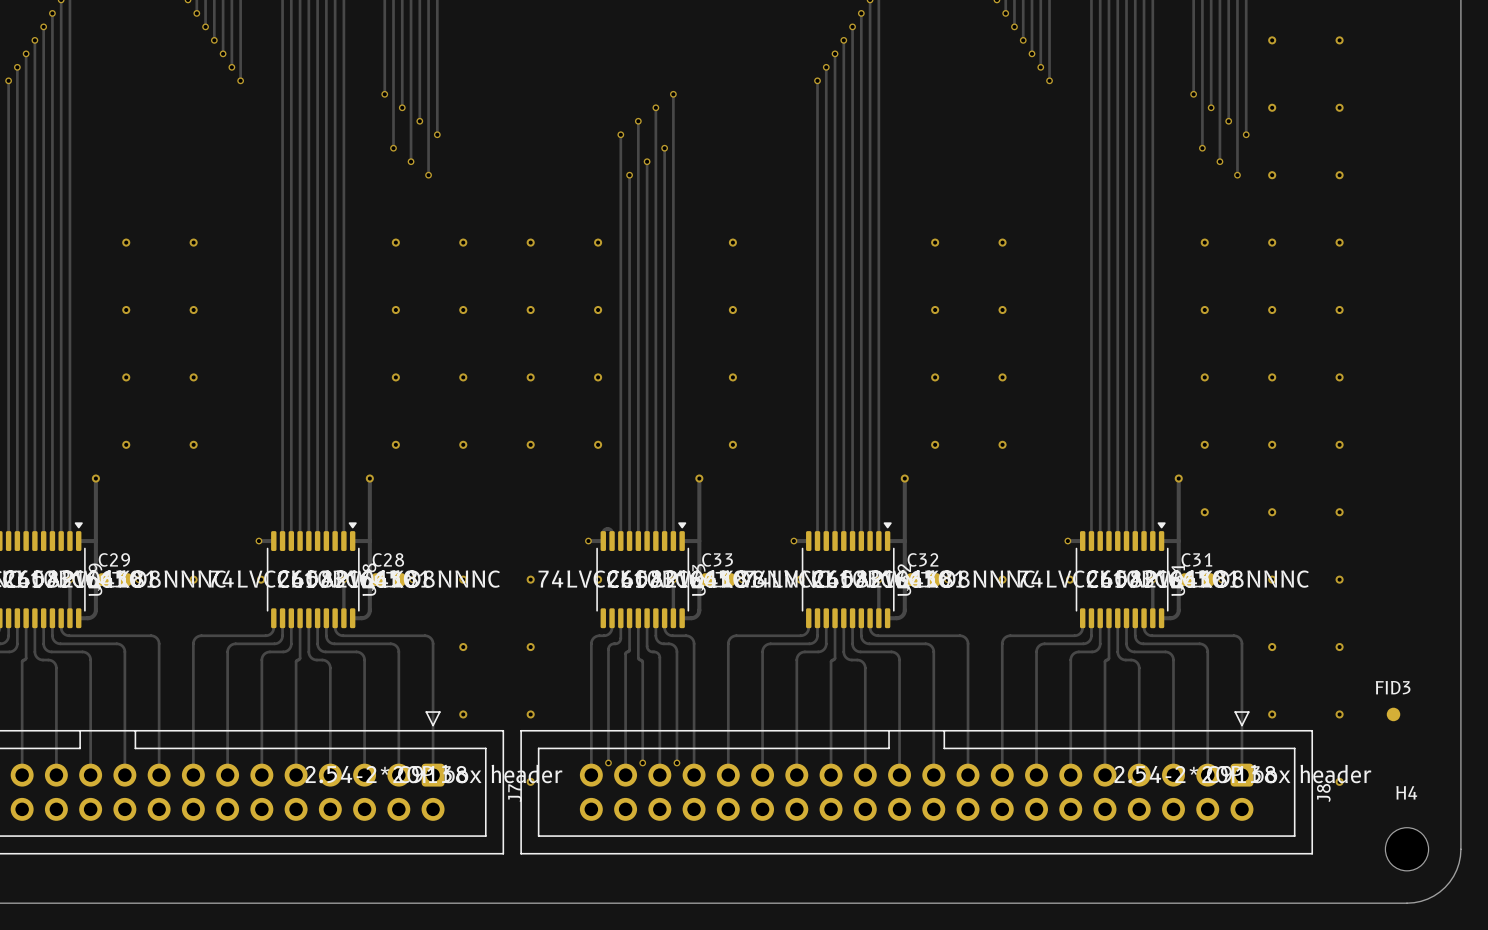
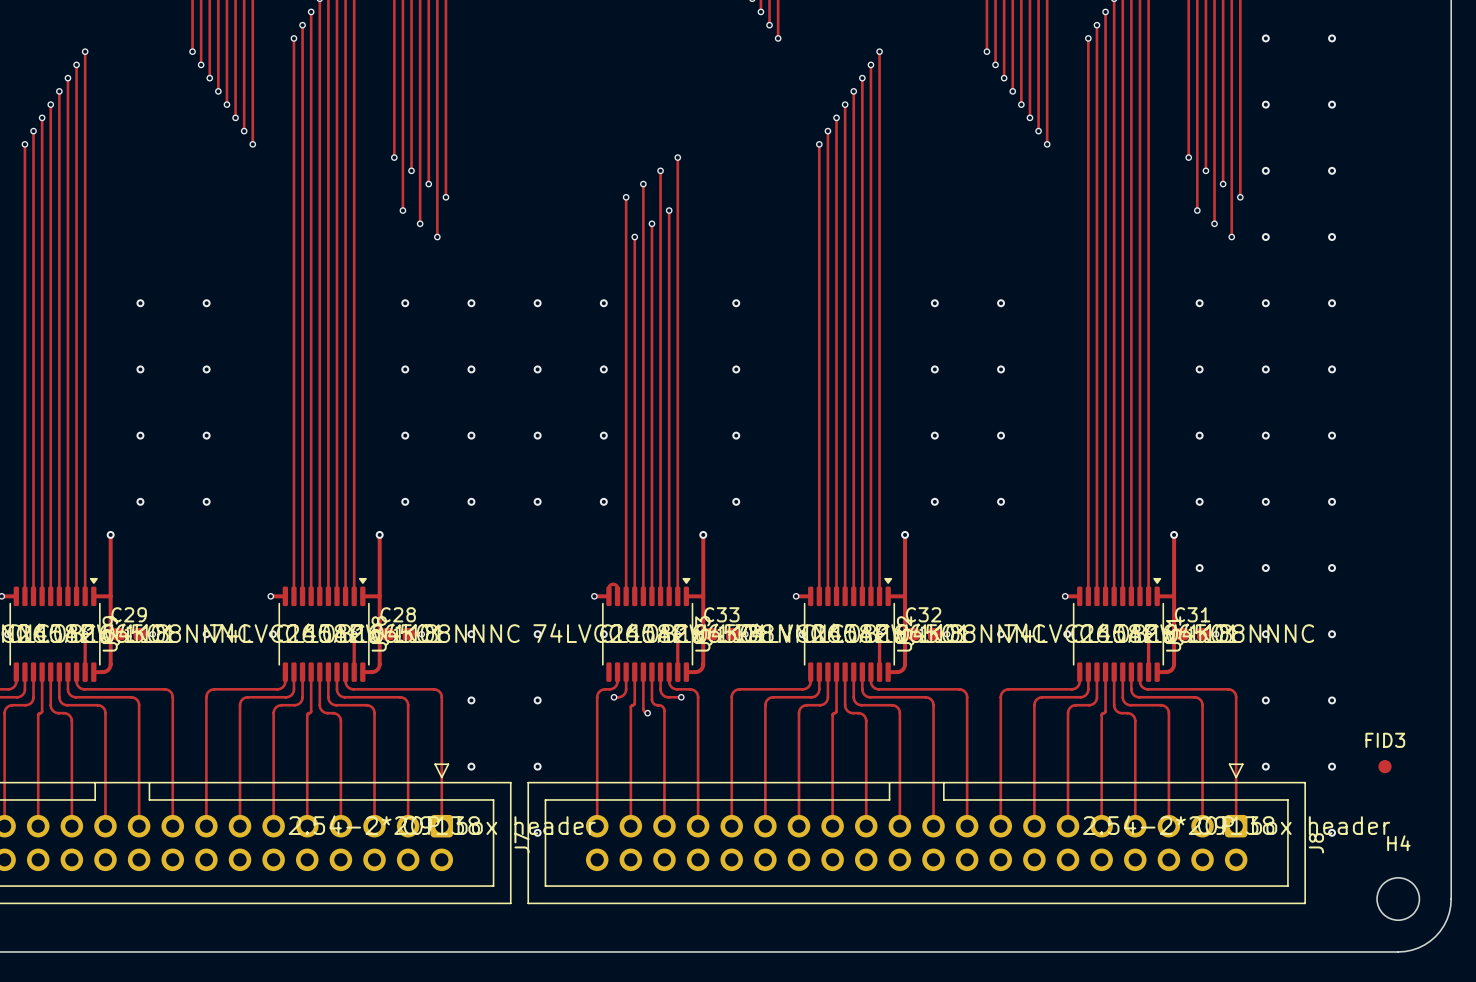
track: (620, 635) (619, 642) (611, 644) (608, 648) (608, 762) -> (626, 689) (622, 696) (614, 697)
via: none -> (614, 697)
track: (668, 643) (674, 646) (676, 650) (676, 762) -> (673, 697) (681, 697)
via: none -> (681, 697)
track: (638, 655) (638, 659) (642, 661) (642, 762) -> (643, 709) (647, 713)
via: none -> (647, 713)
via: (608, 762) -> none
via: (642, 762) -> none
via: (676, 762) -> none

